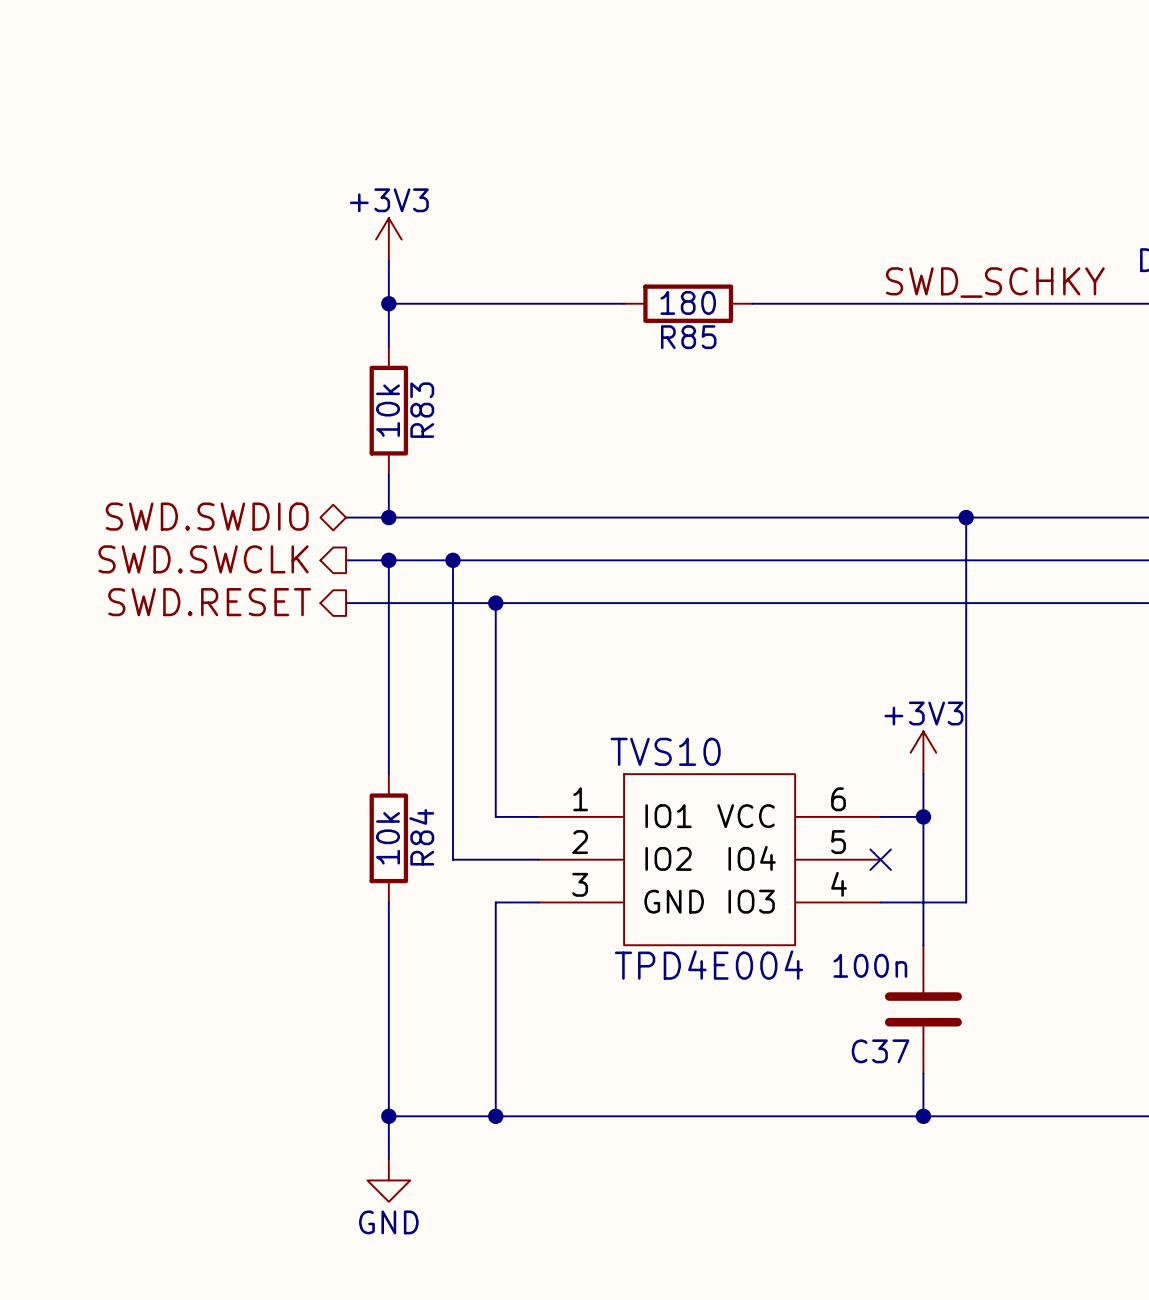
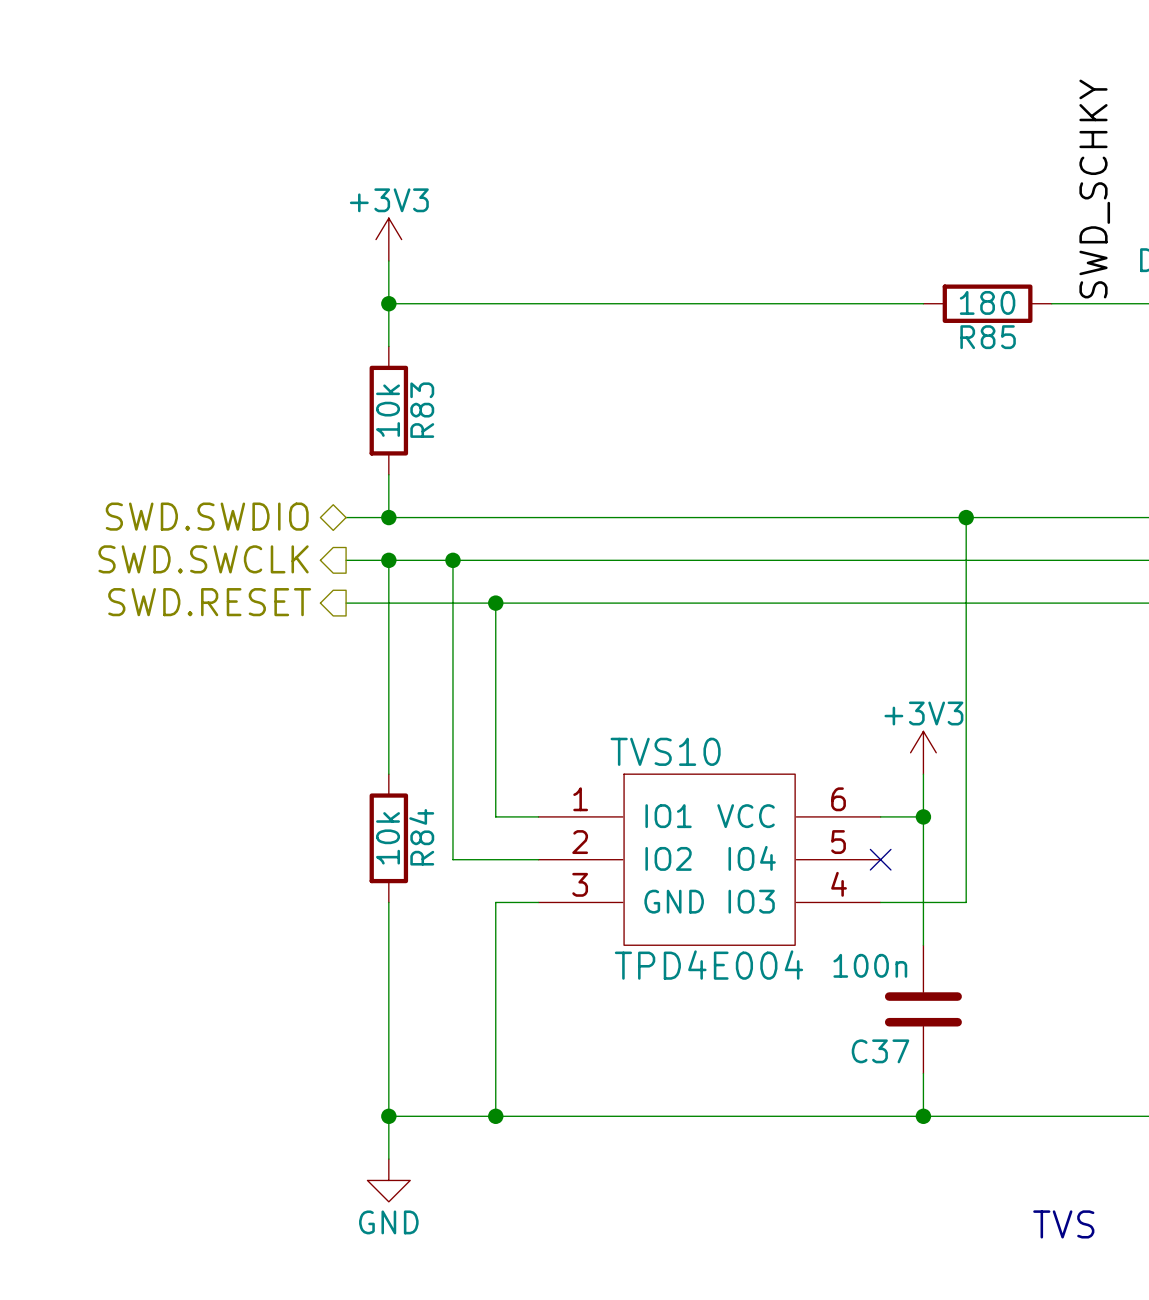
label rotation: 0° (995, 282) -> 90° counterclockwise (1094, 189)
R85 position: (688, 303) -> (987, 303)
wire: (923, 303) (1051, 303) -> (624, 303) (752, 303)
text: none -> TVS (1063, 1224)

